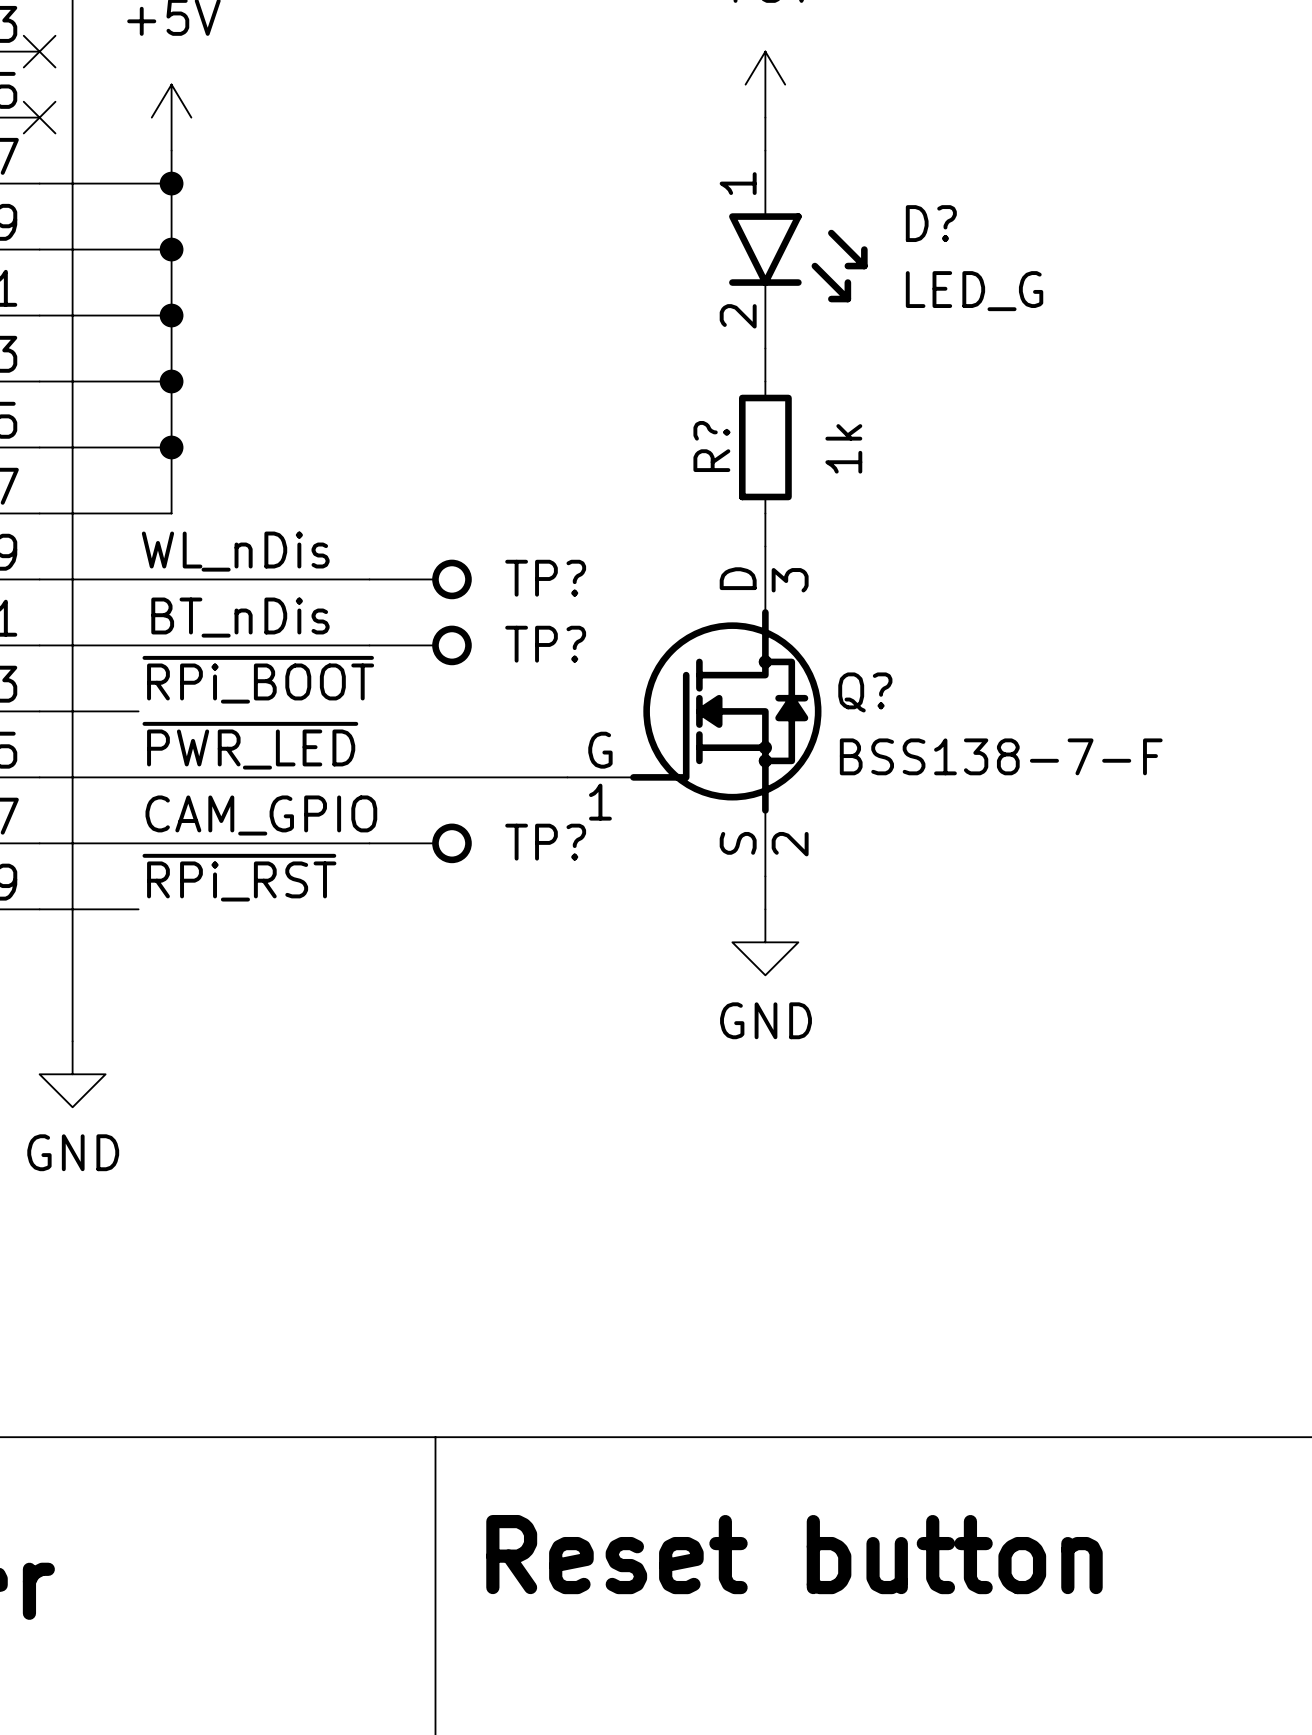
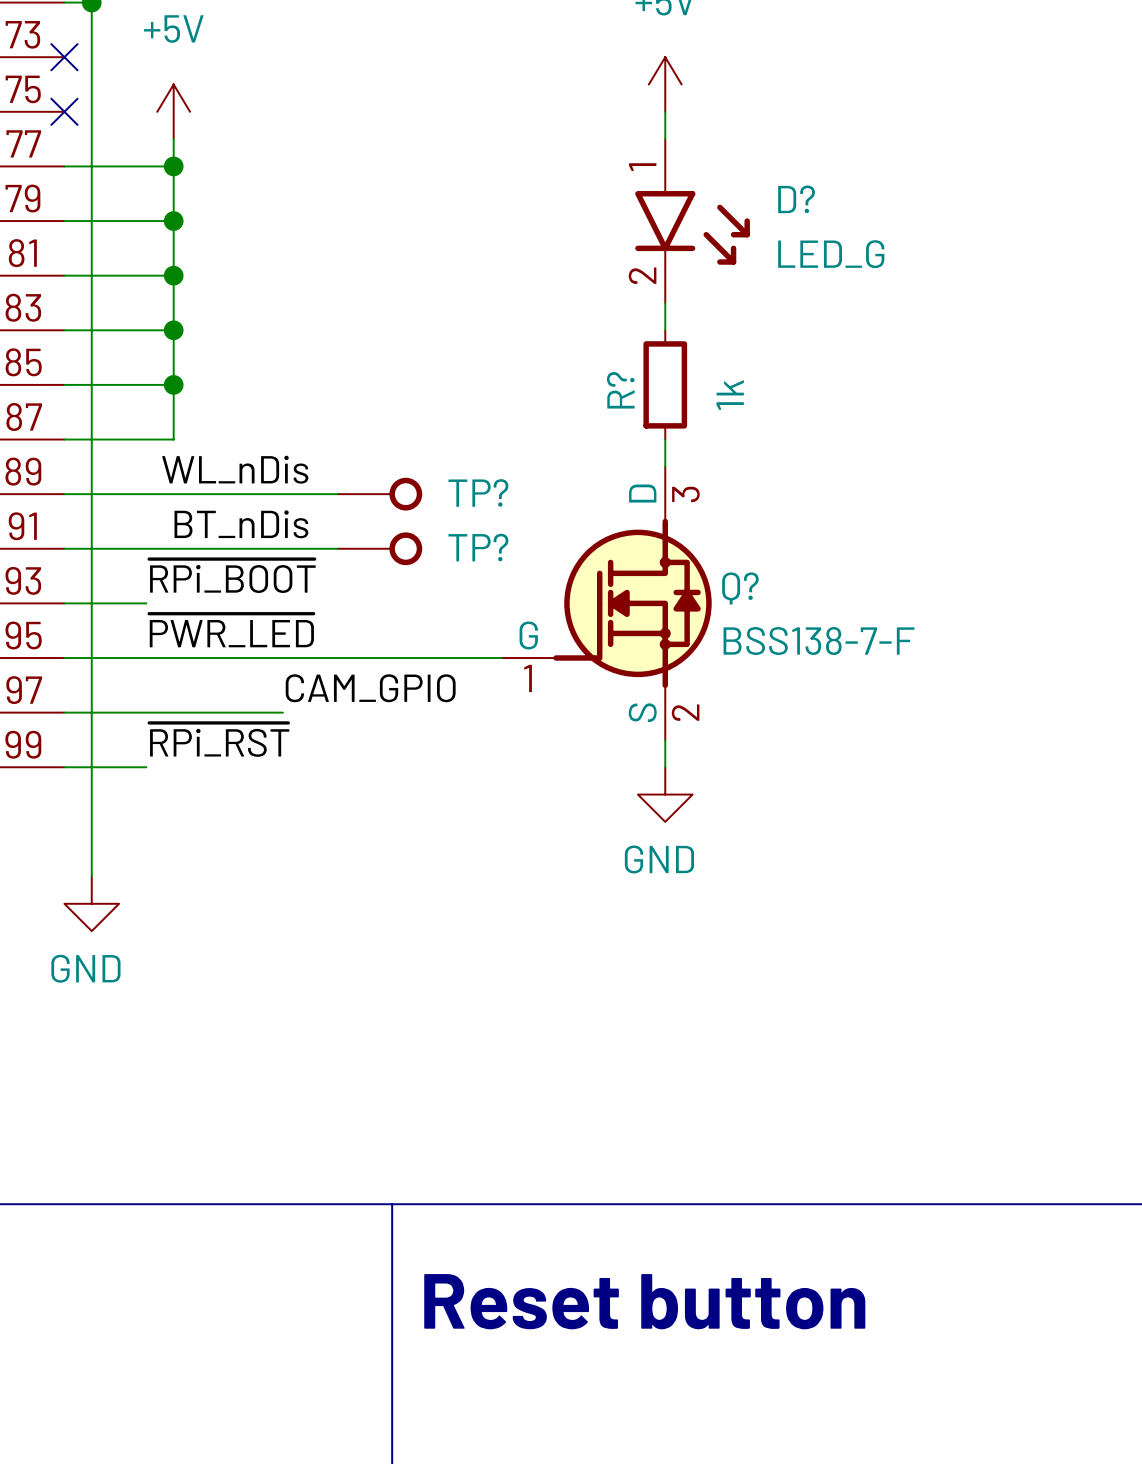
label position: CAM_GPIO (261, 815) -> CAM_GPIO (370, 688)
wire: (303, 843) (369, 843) -> none
TP?: (420, 843) -> none

